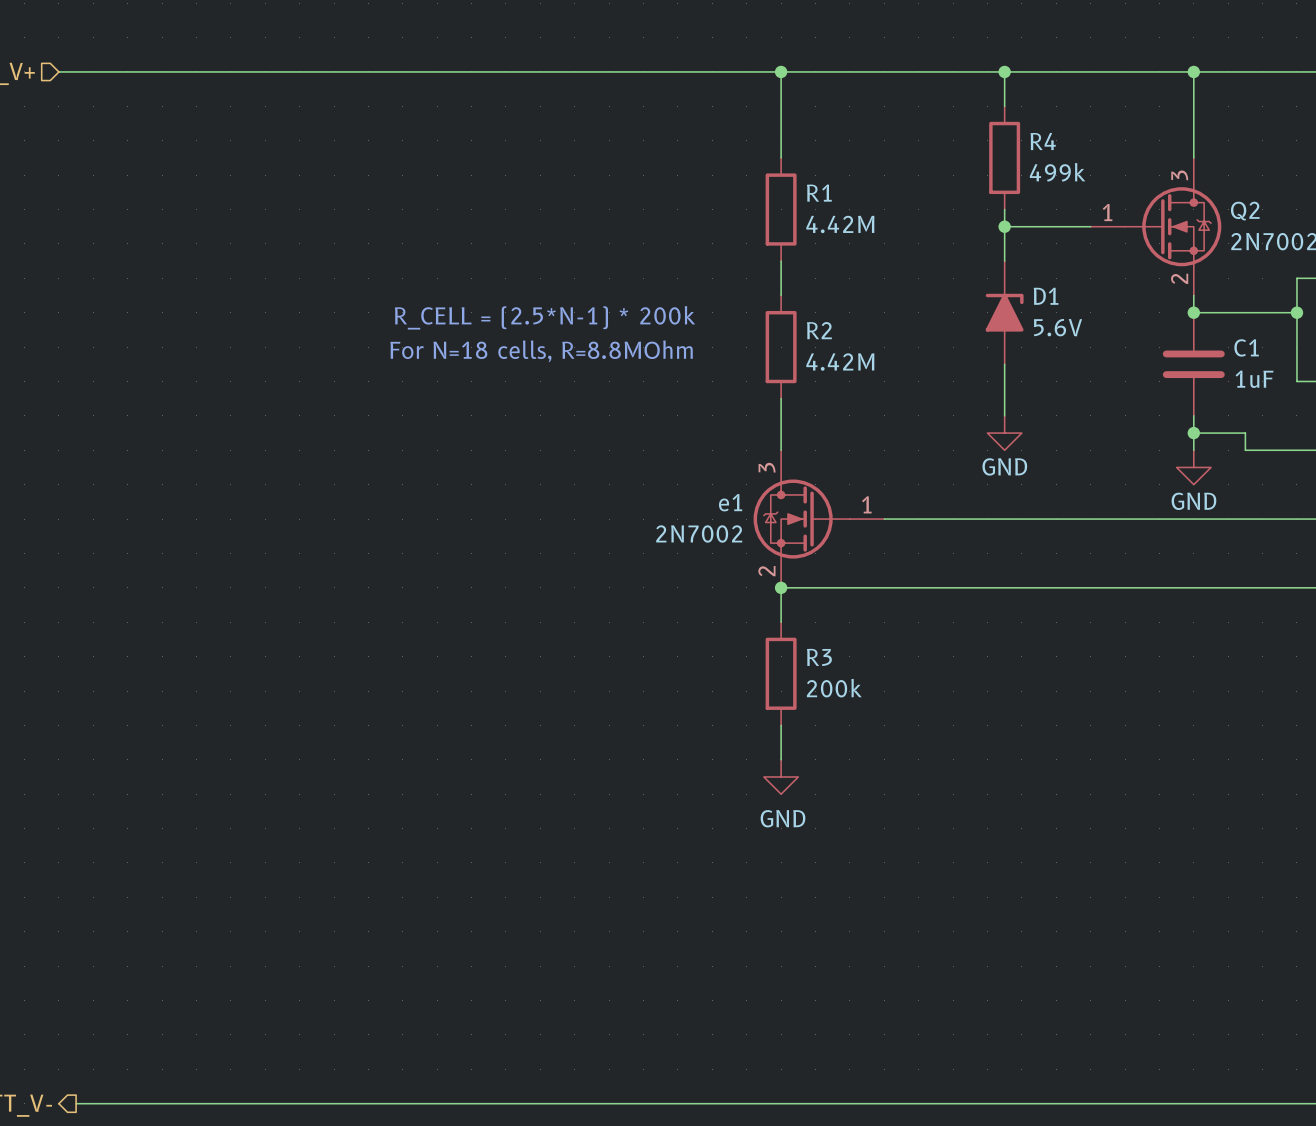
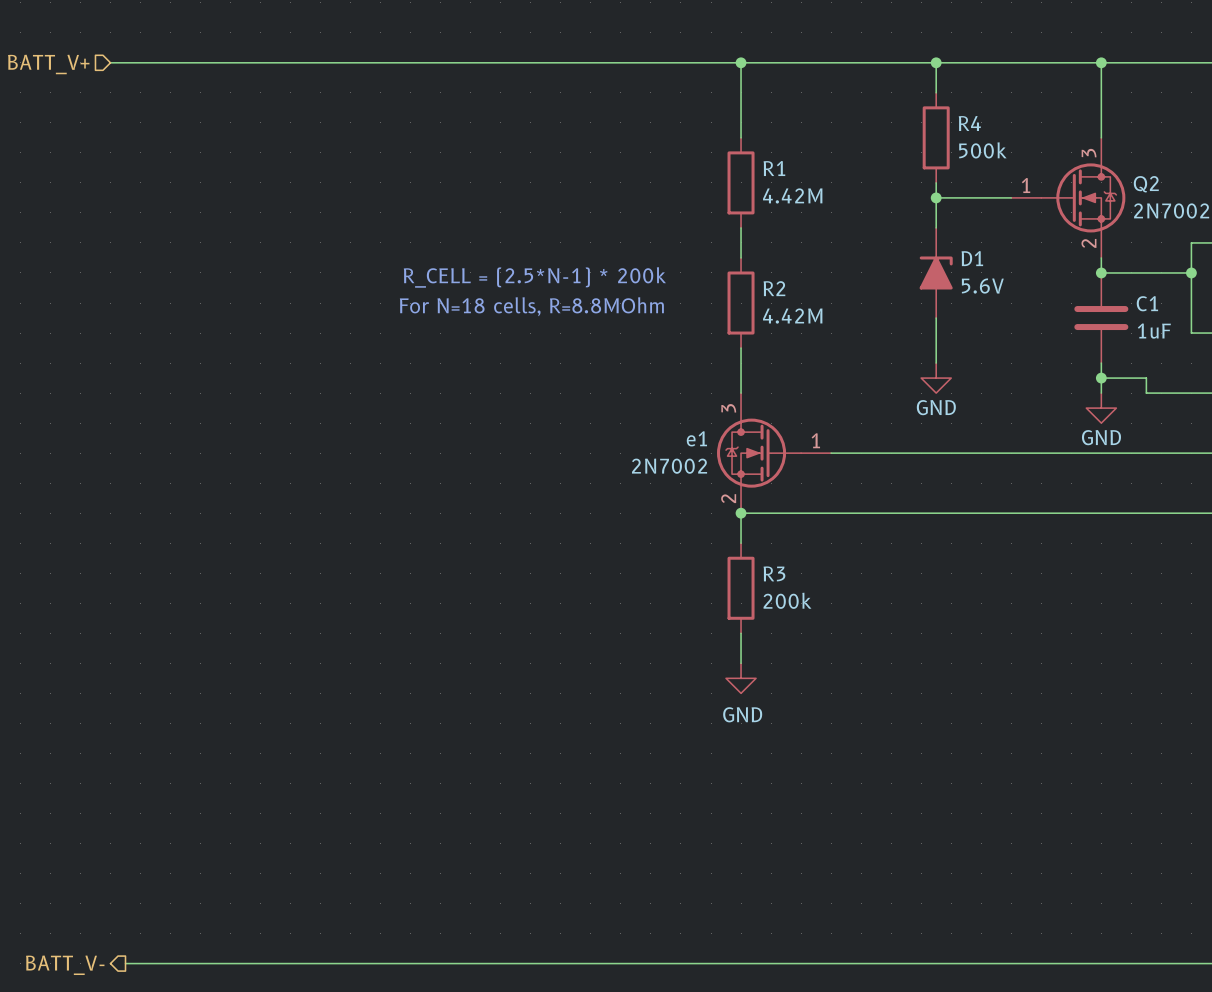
R4 value: 499k (1057, 172) -> 500k (982, 150)

